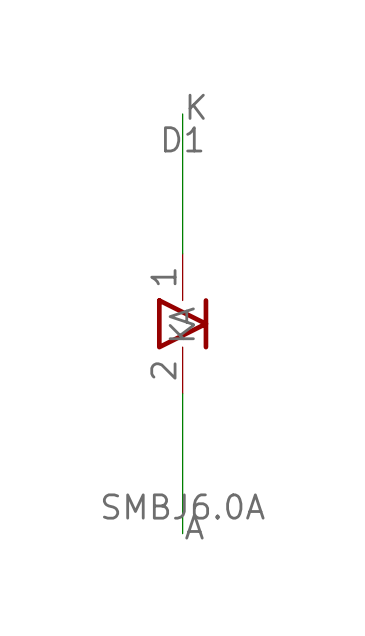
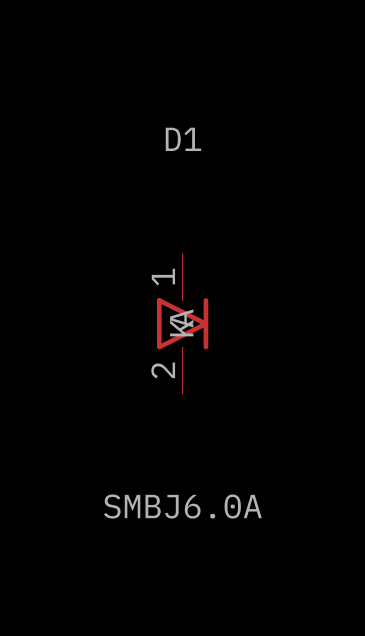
label: K (196, 106) -> none
wire: (182, 113) (182, 253) -> none
wire: (182, 393) (182, 533) -> none
label: A (194, 526) -> none

